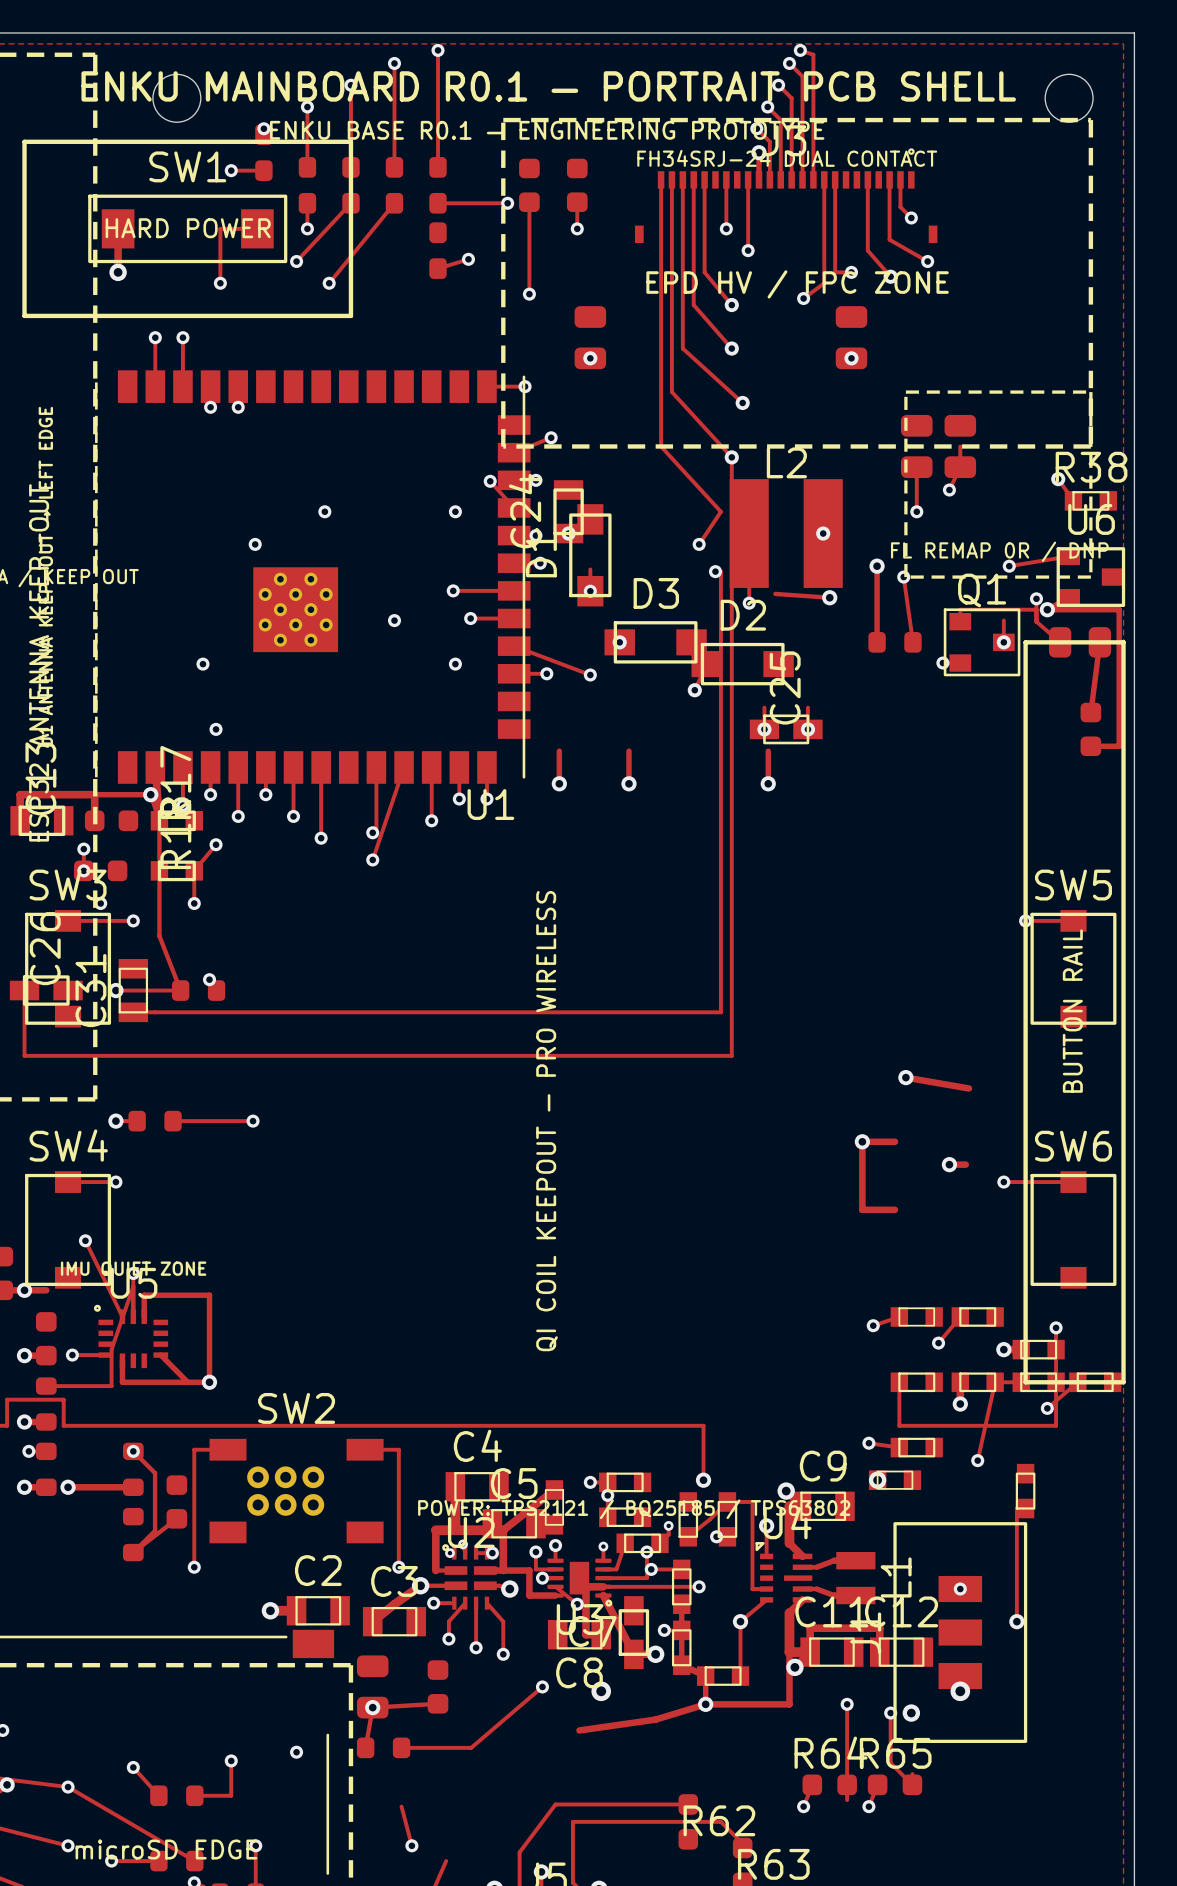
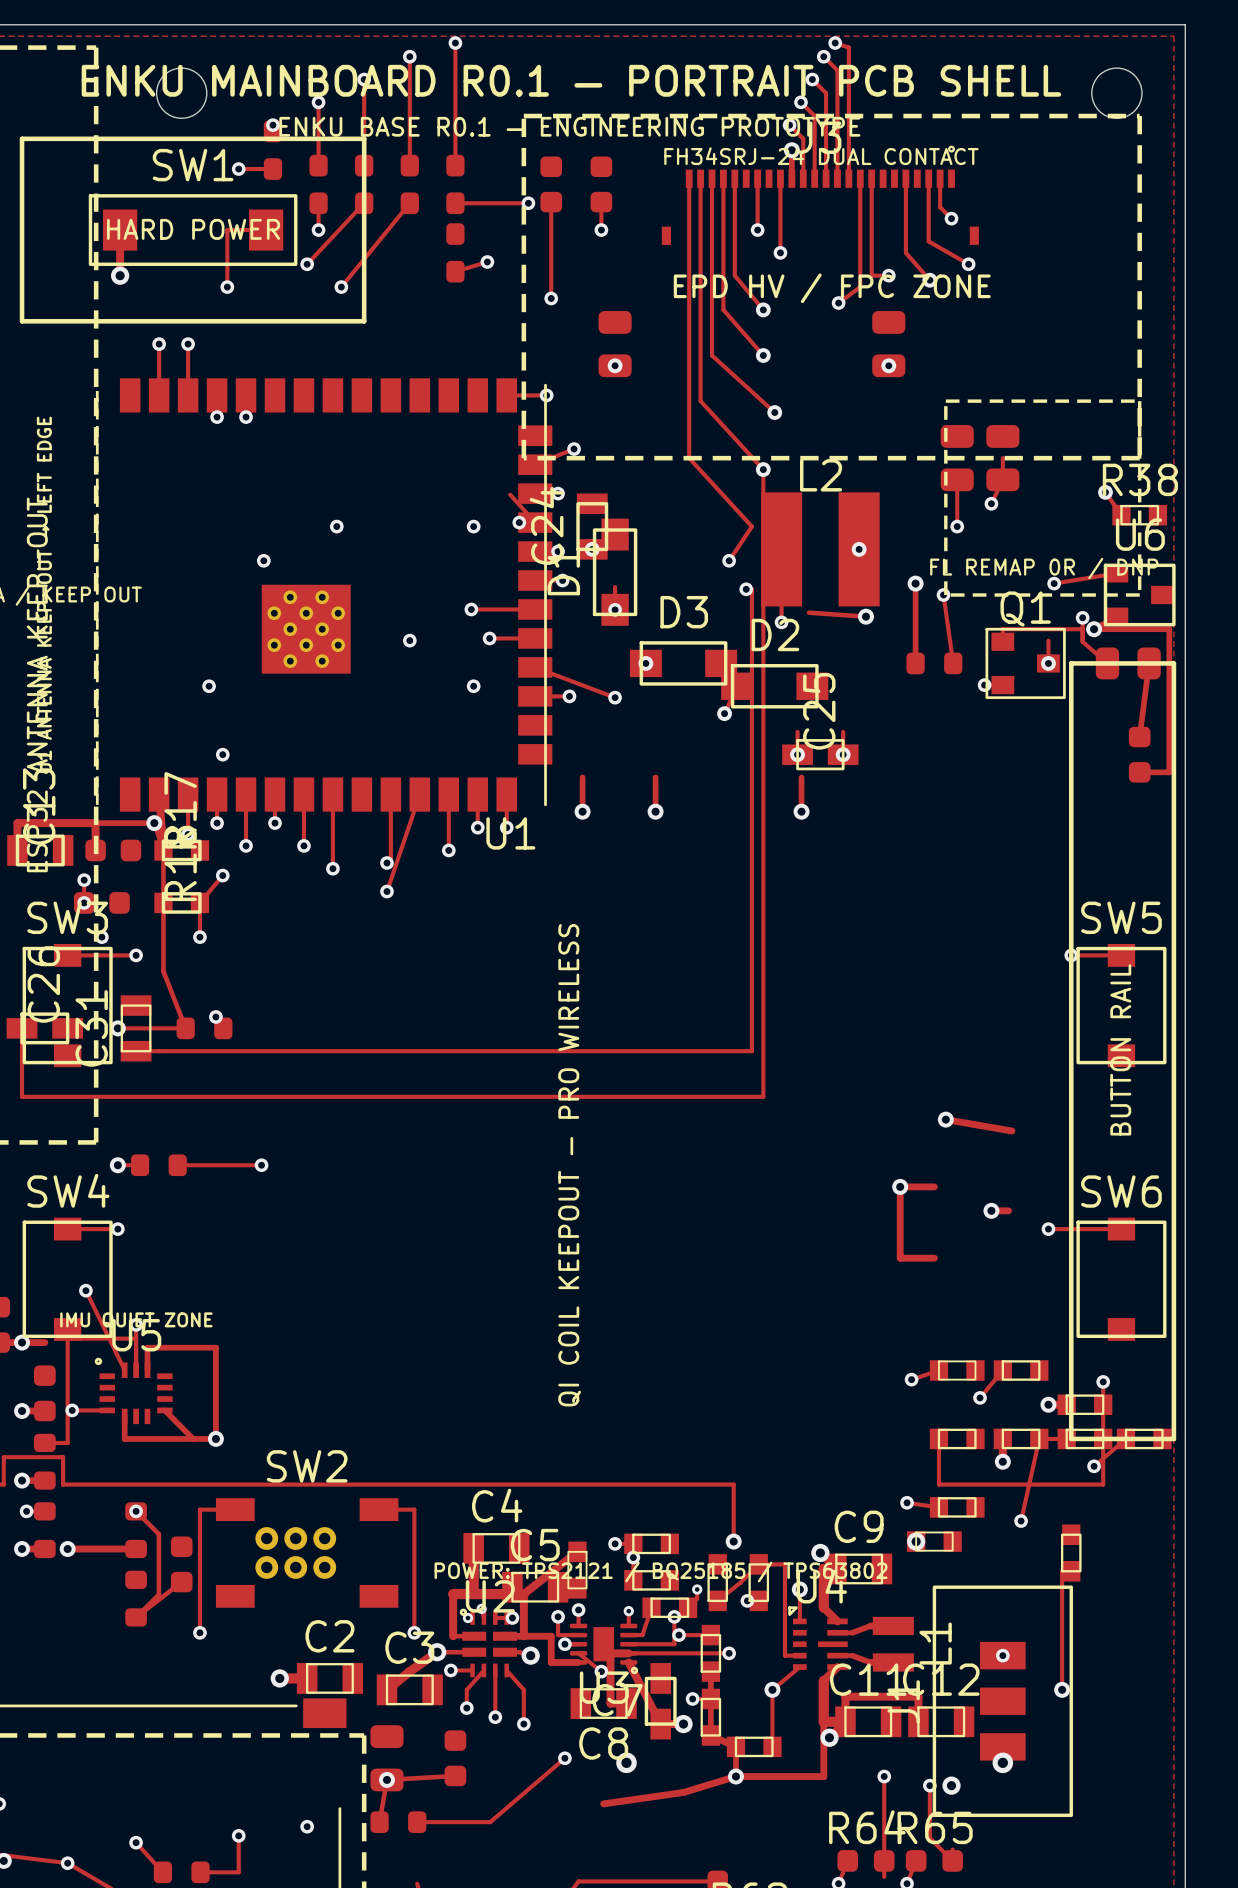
via position: (490, 481) -> (519, 522)
track: (133, 1286) (111, 1349) (111, 1386) (68, 1386) -> (136, 1338) (67, 1338) (67, 1442)

